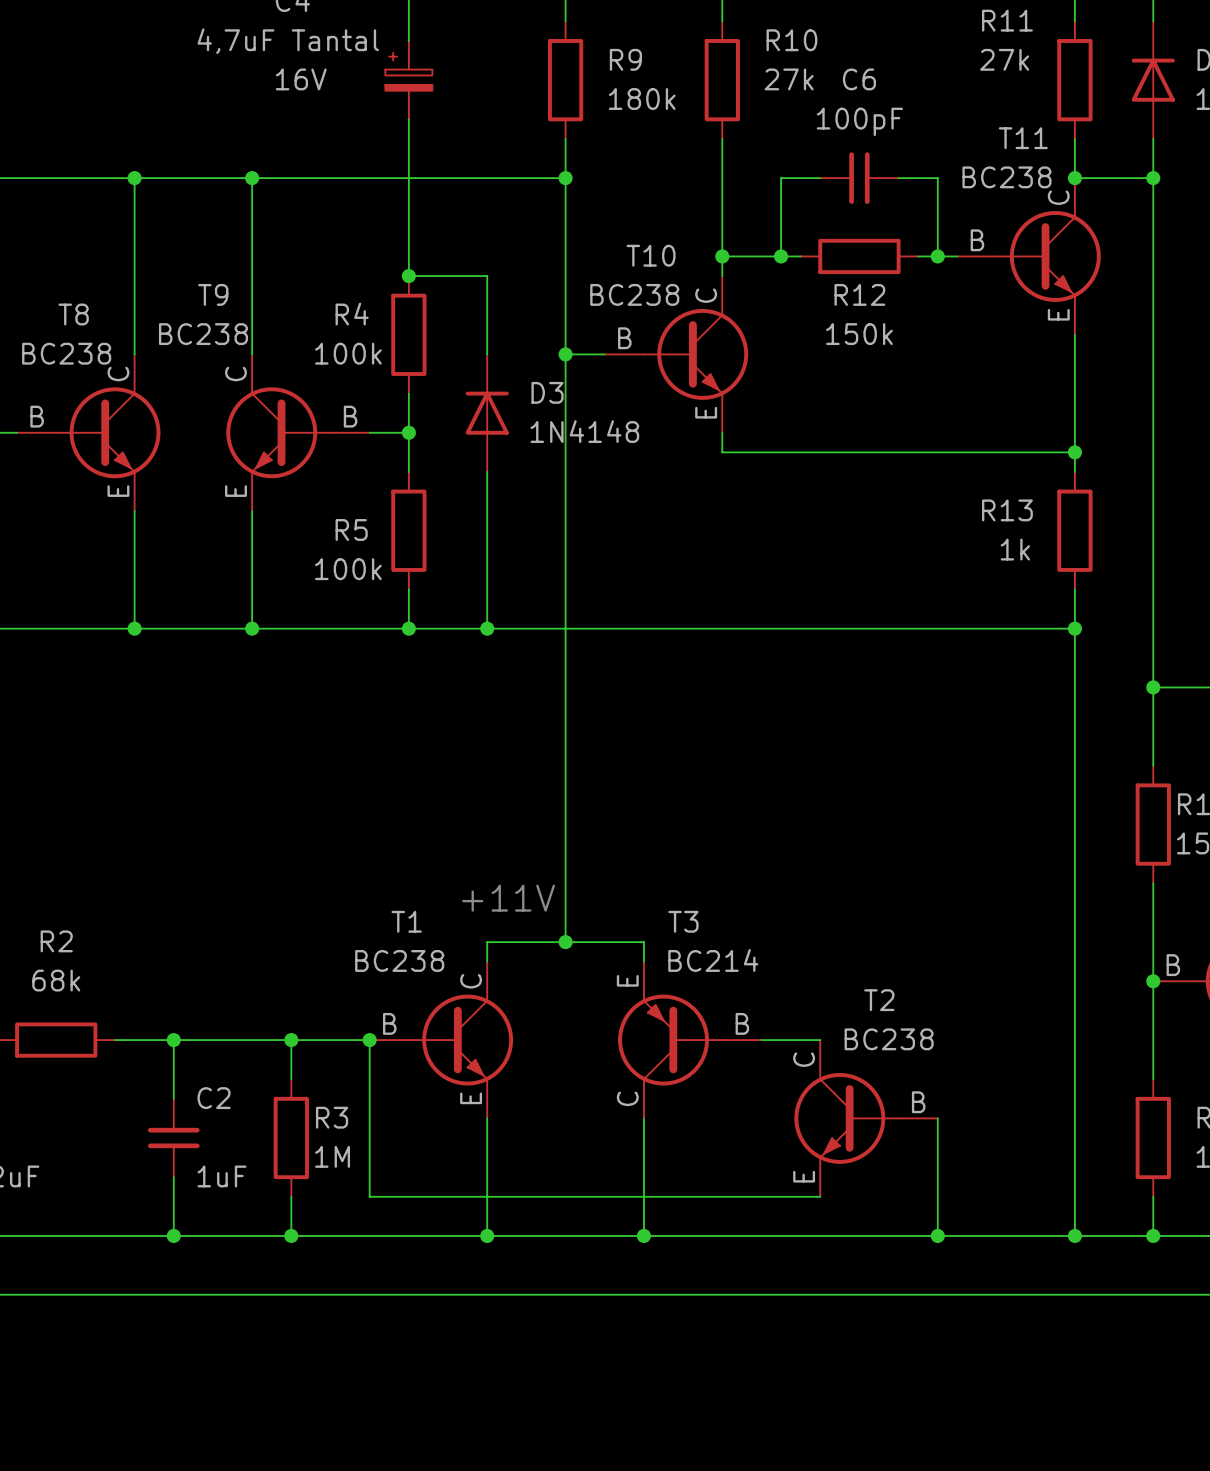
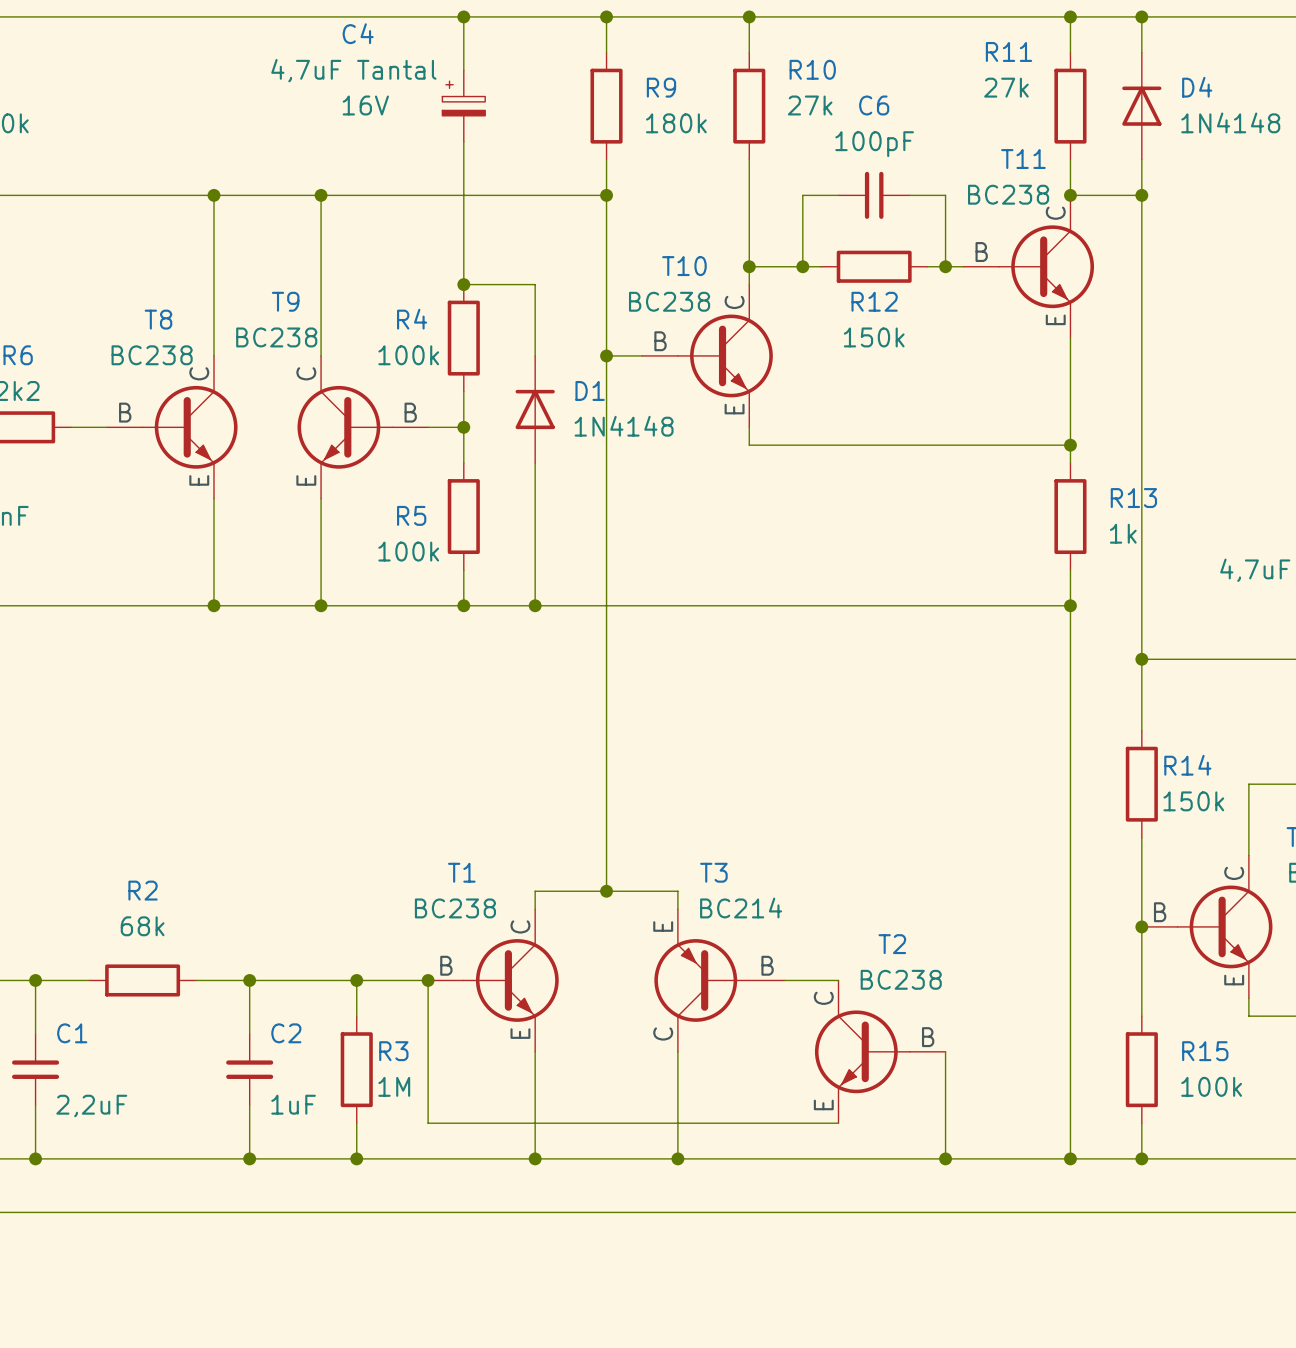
D3 name: D3 (547, 392) -> D1 (590, 390)
R13 name position: R13 (1007, 510) -> R13 (1133, 498)
R13 value position: 1k (1015, 549) -> 1k (1123, 533)
text: +11V (508, 898) -> none

